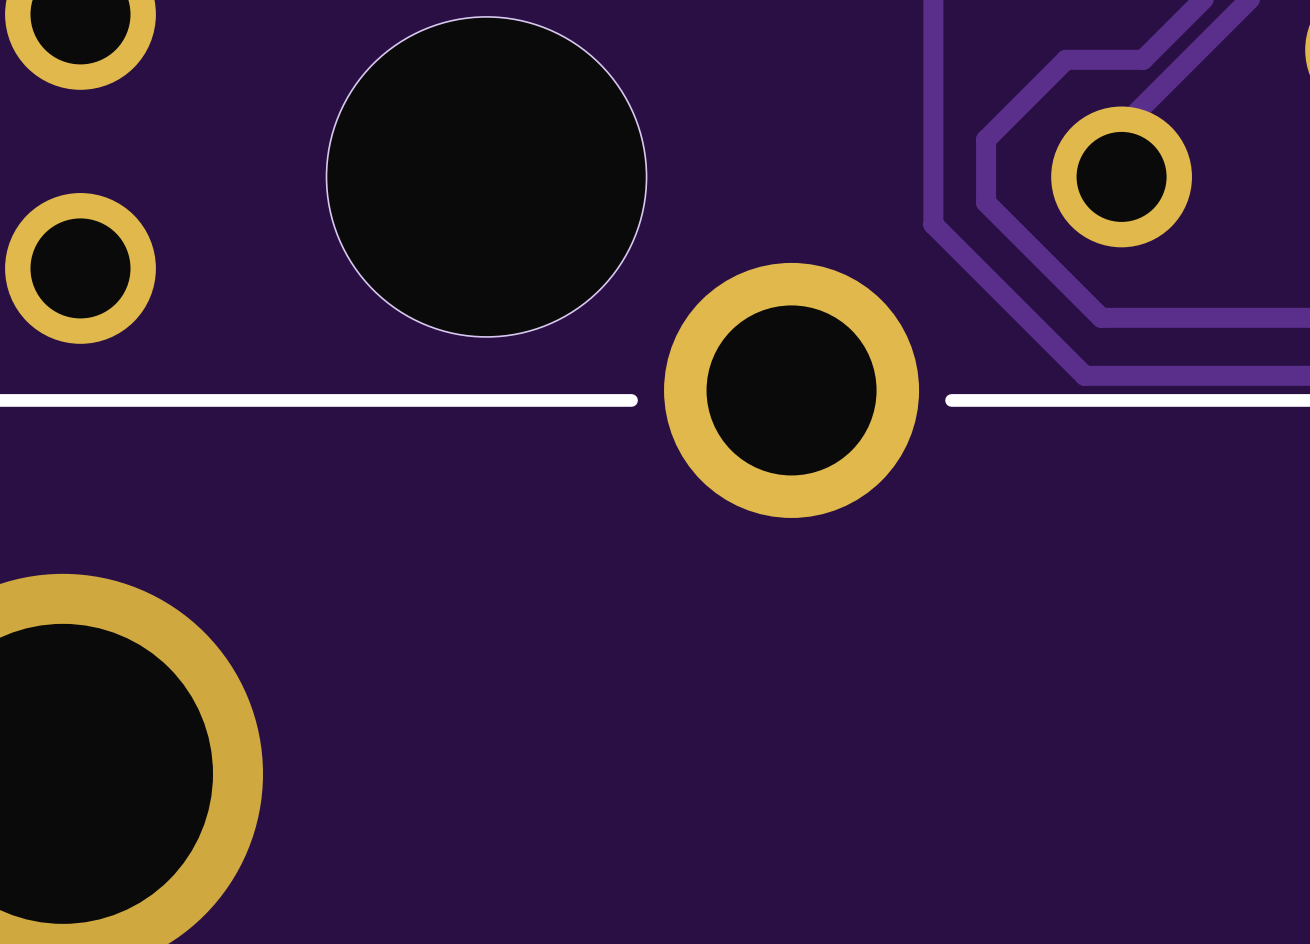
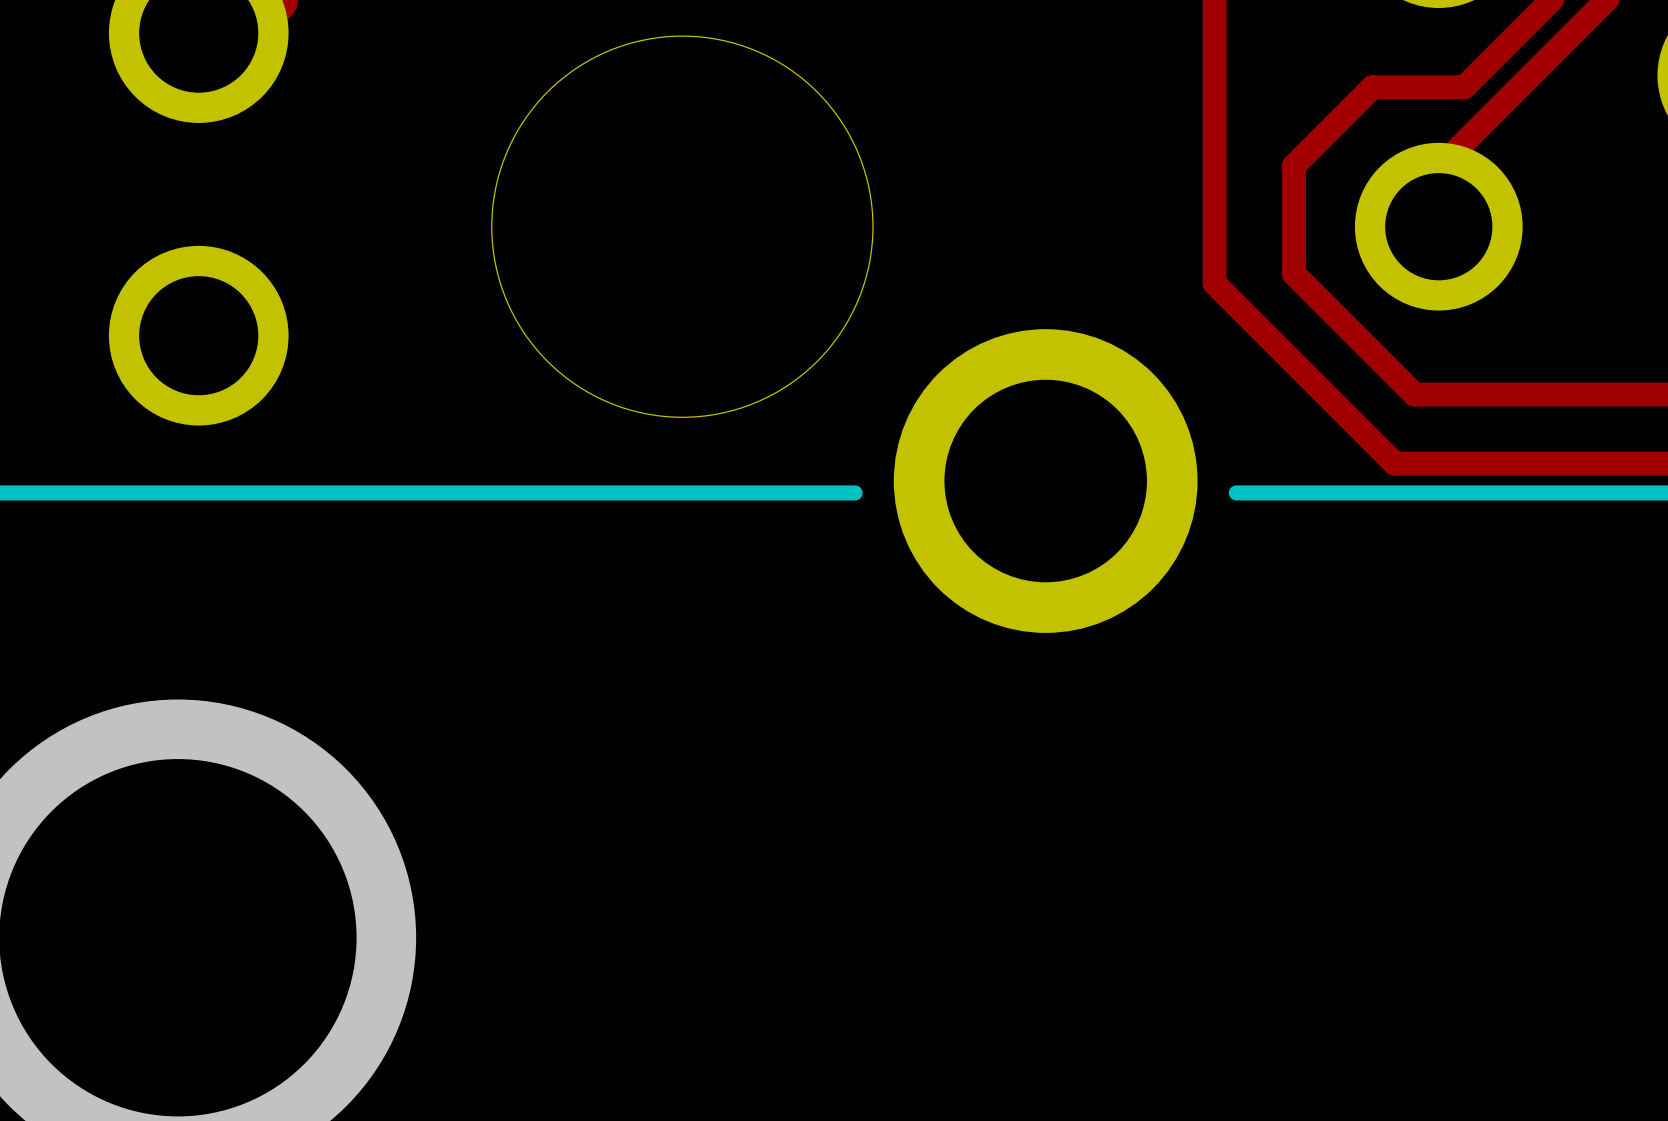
track: (1000, 125) (986, 139) (986, 202) (1000, 216) -> (1294, 165) (1294, 273)

